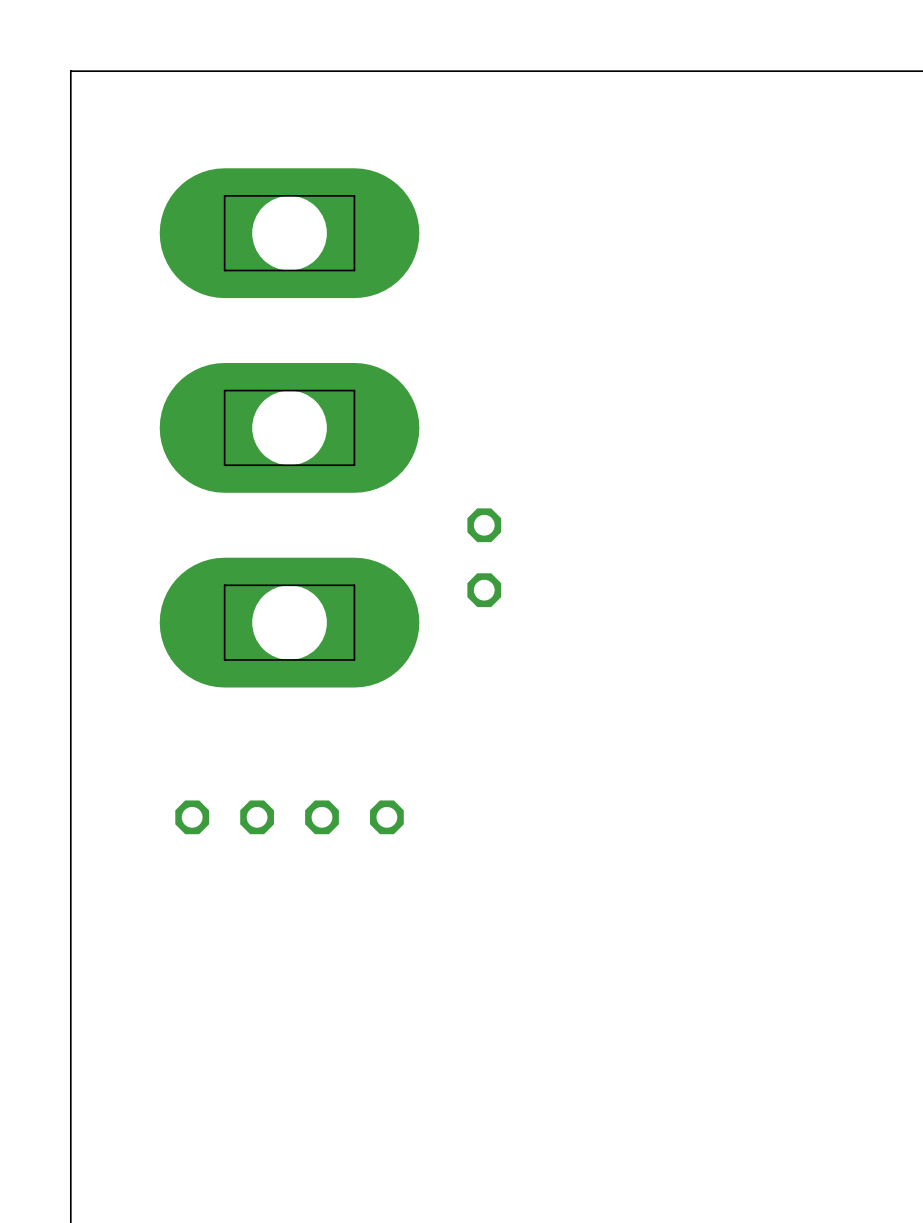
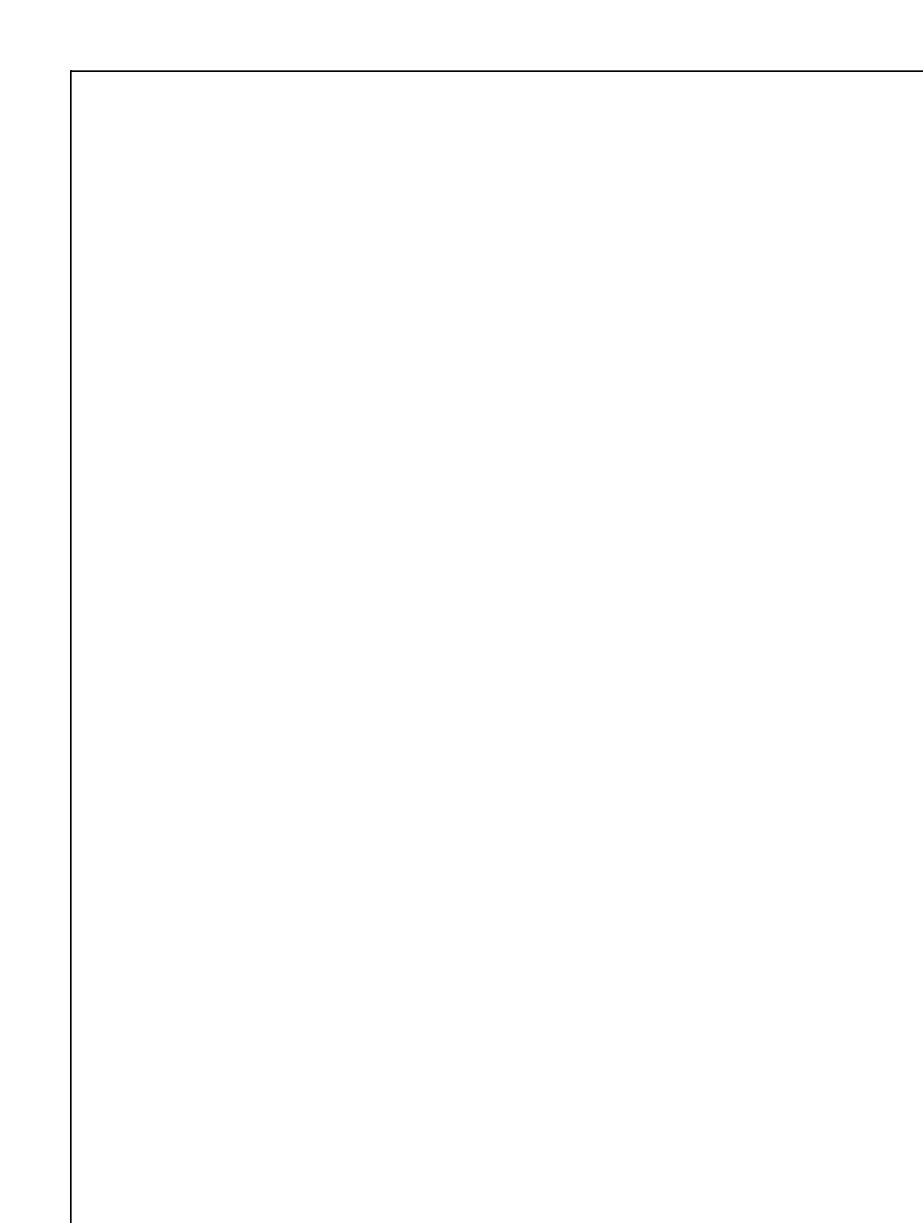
part: (289, 233) -> none
part: (289, 427) -> none
part: (484, 557) -> none
part: (289, 622) -> none
part: (224, 817) -> none
part: (354, 817) -> none

